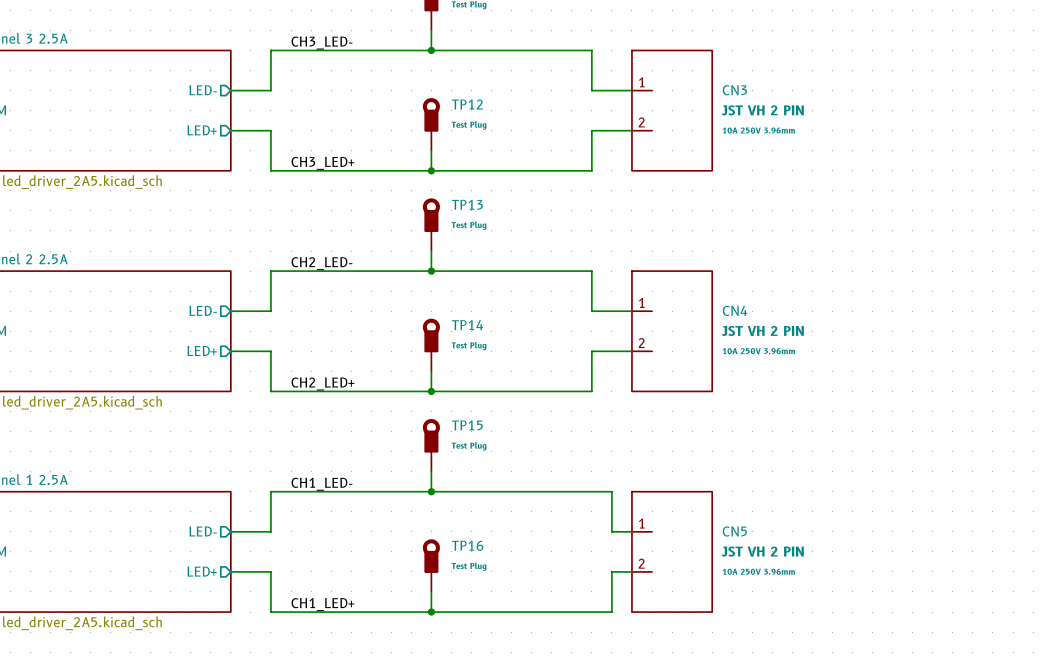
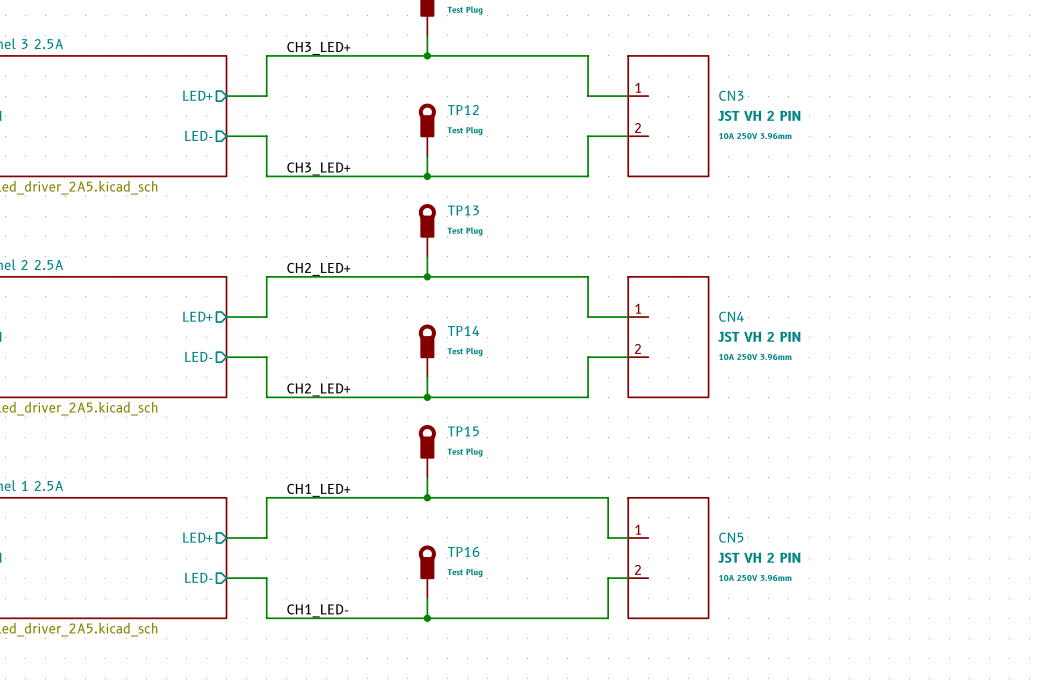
label: CH3_LED- (321, 43) -> CH3_LED+ (318, 48)
sheet pin: LED- (203, 90) -> LED+ (197, 95)
sheet pin: LED+ (202, 130) -> LED- (198, 135)
label: CH2_LED- (321, 263) -> CH2_LED+ (318, 269)
sheet pin: LED- (203, 310) -> LED+ (197, 316)
sheet pin: LED+ (202, 350) -> LED- (198, 356)
label: CH1_LED- (321, 484) -> CH1_LED+ (318, 490)
sheet pin: LED- (203, 531) -> LED+ (197, 537)
sheet pin: LED+ (202, 571) -> LED- (198, 577)
label: CH1_LED+ (322, 604) -> CH1_LED- (317, 610)

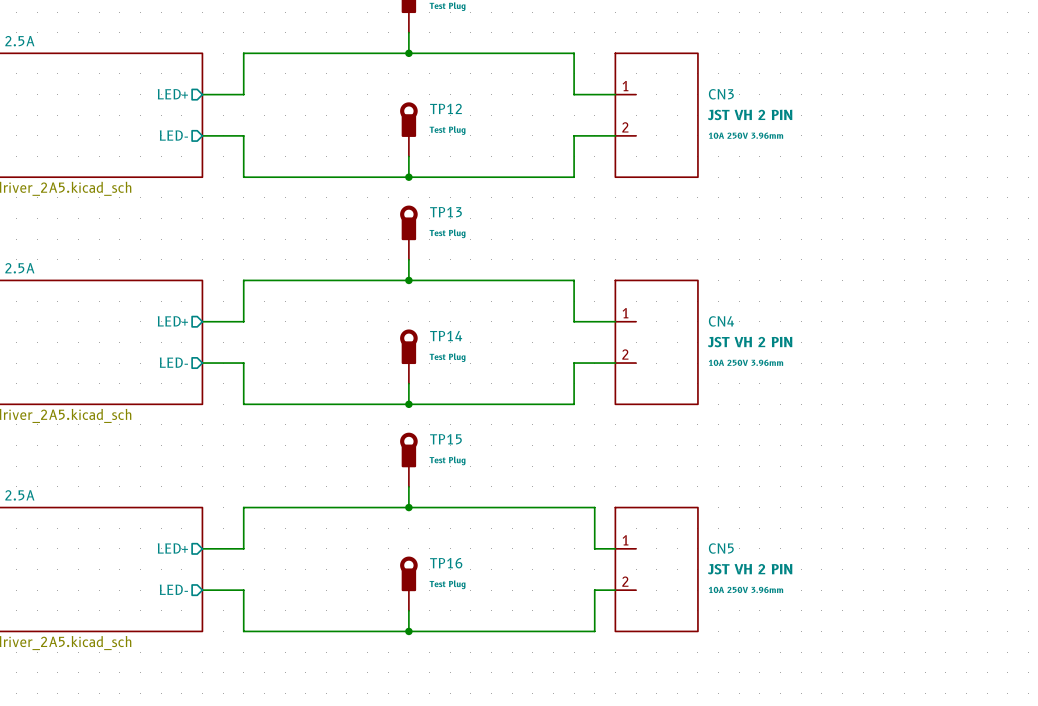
label: CH3_LED+ (318, 48) -> none
label: CH3_LED+ (318, 168) -> none
label: CH2_LED+ (318, 269) -> none
label: CH2_LED+ (318, 389) -> none
label: CH1_LED+ (318, 490) -> none
label: CH1_LED- (317, 610) -> none

